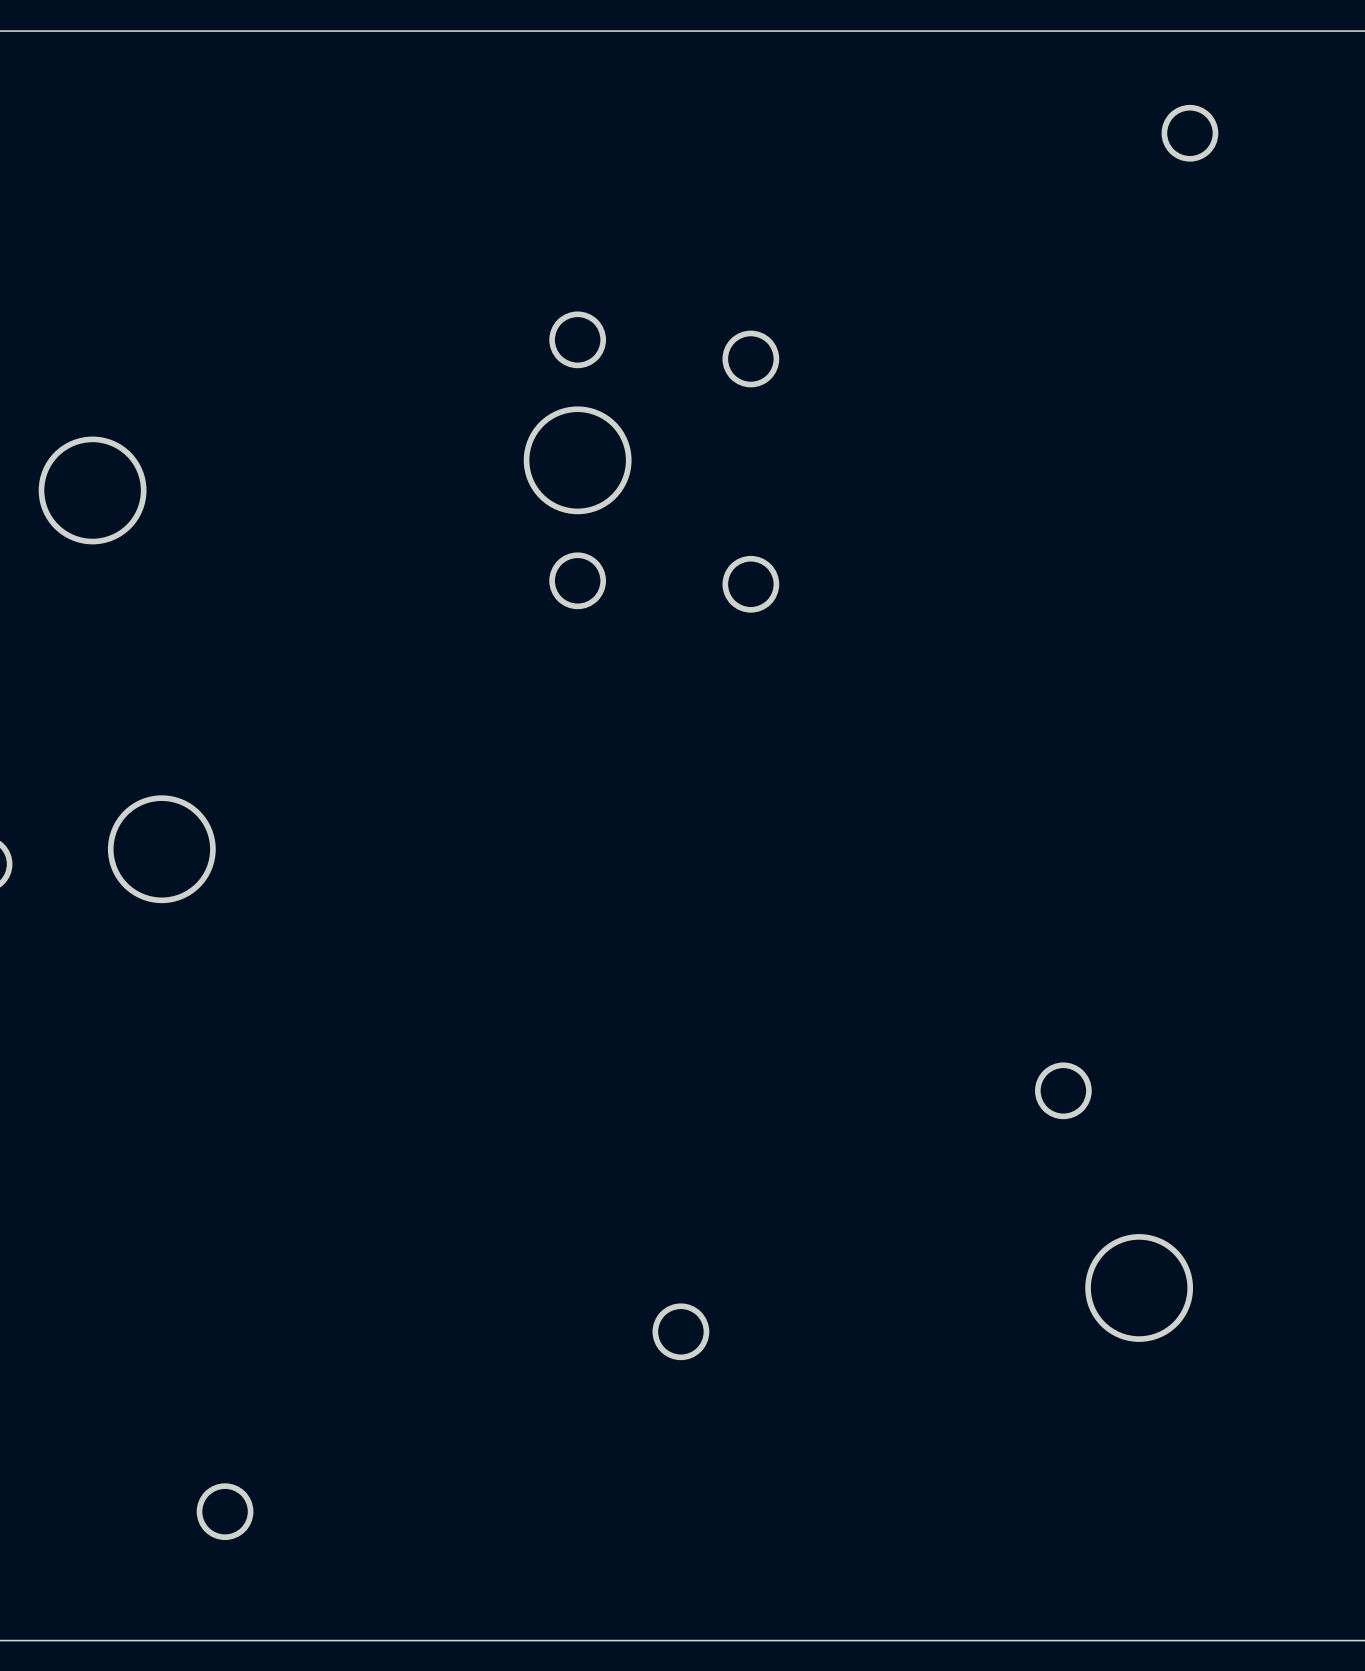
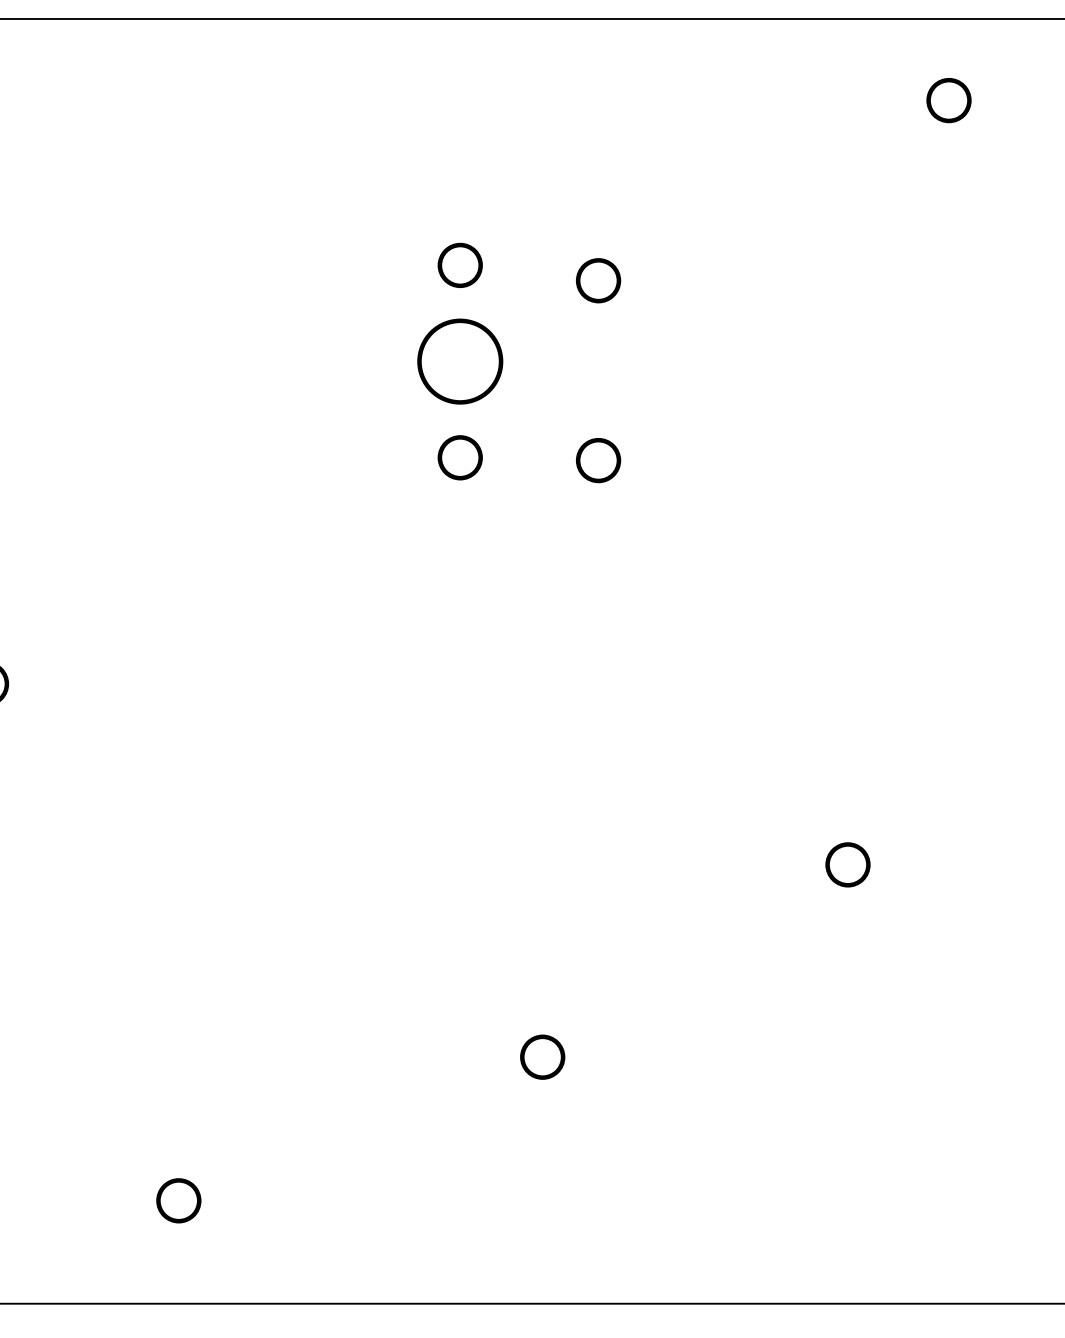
round board edge: [38, 436, 147, 545] -> none
round board edge: [107, 795, 216, 904] -> none
round board edge: [1085, 1234, 1194, 1342] -> none

